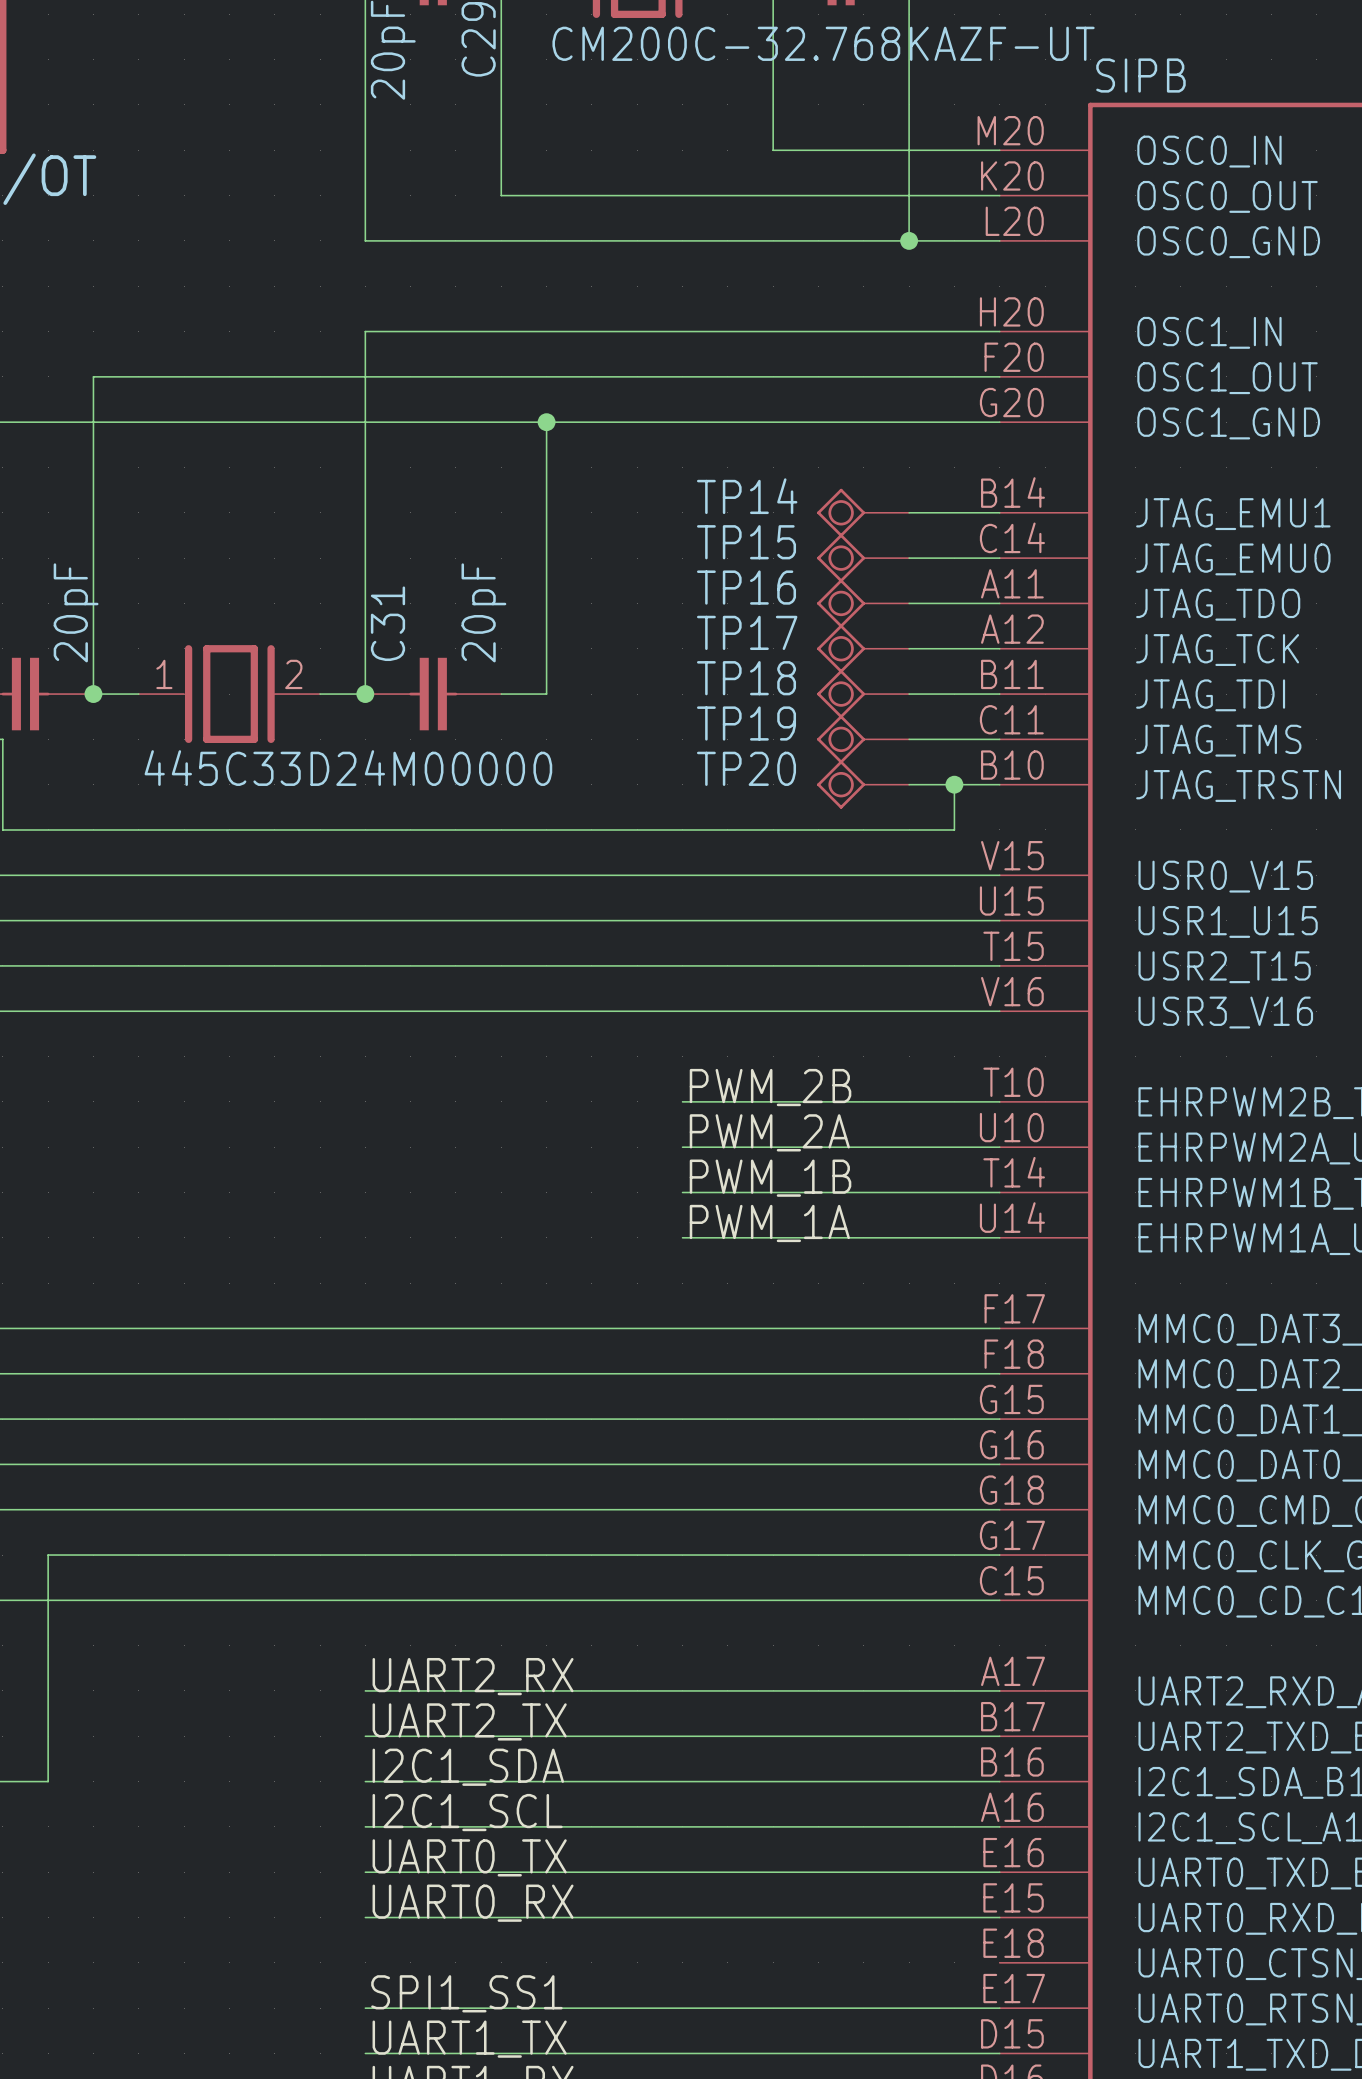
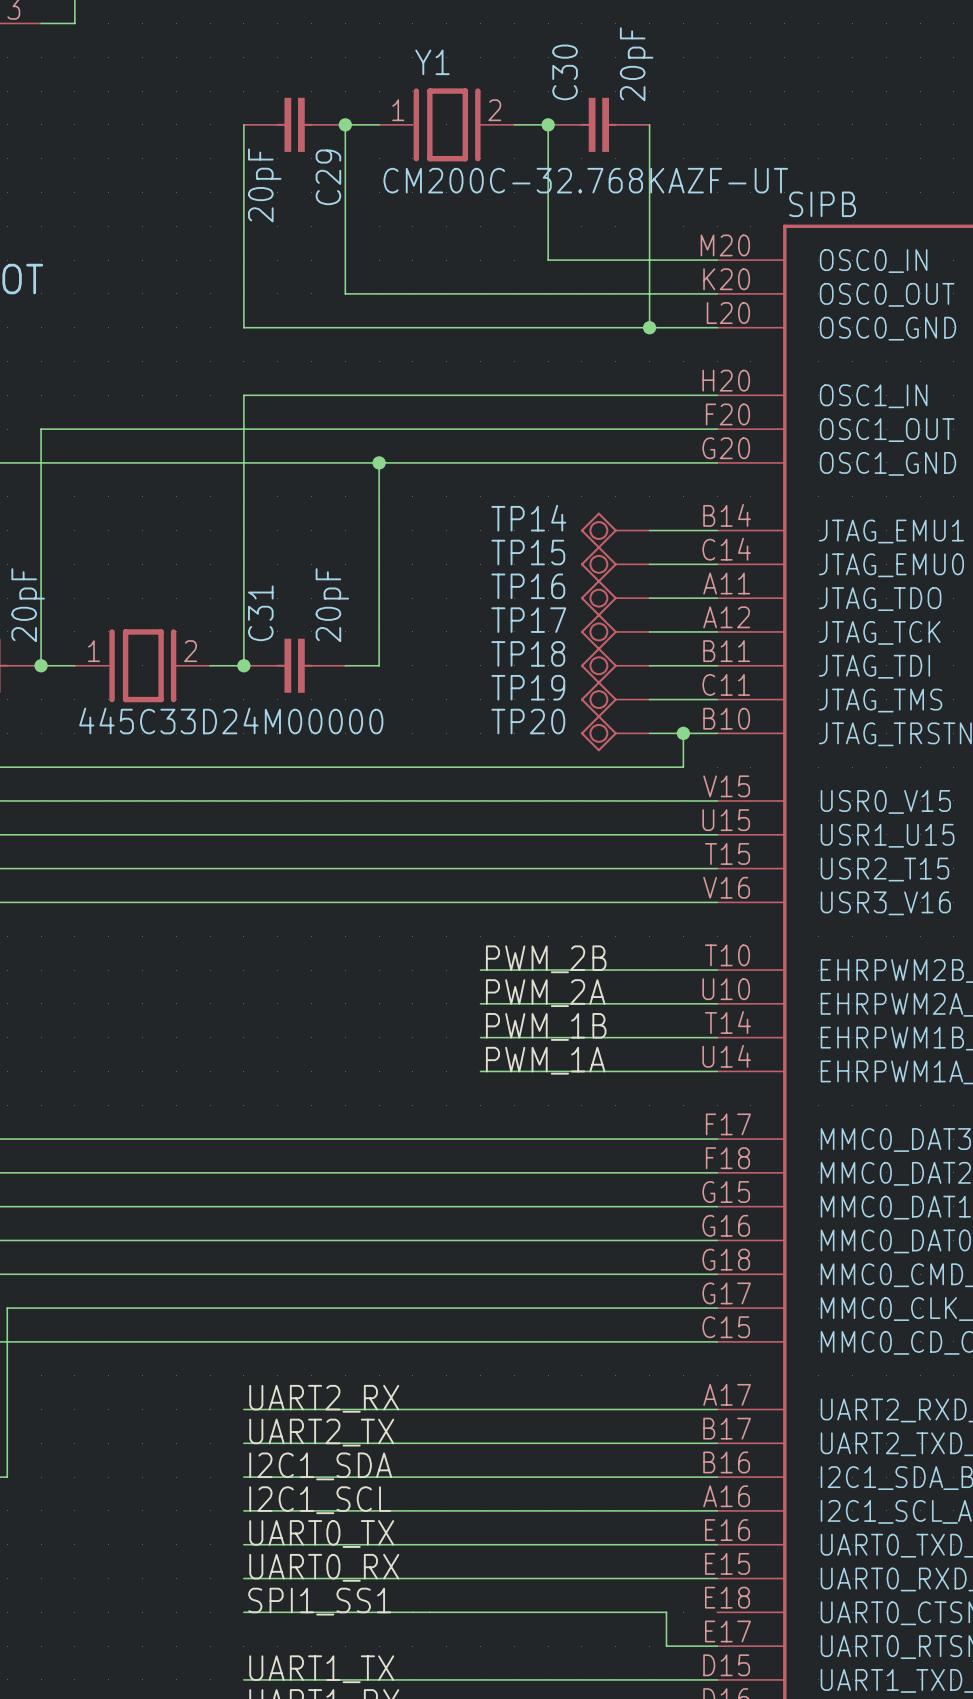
label position: SPI1_SS1 (466, 1993) -> SPI1_SS1 (319, 1601)
wire: (365, 2008) (931, 2008) -> (243, 1612) (666, 1612) (666, 1646)

